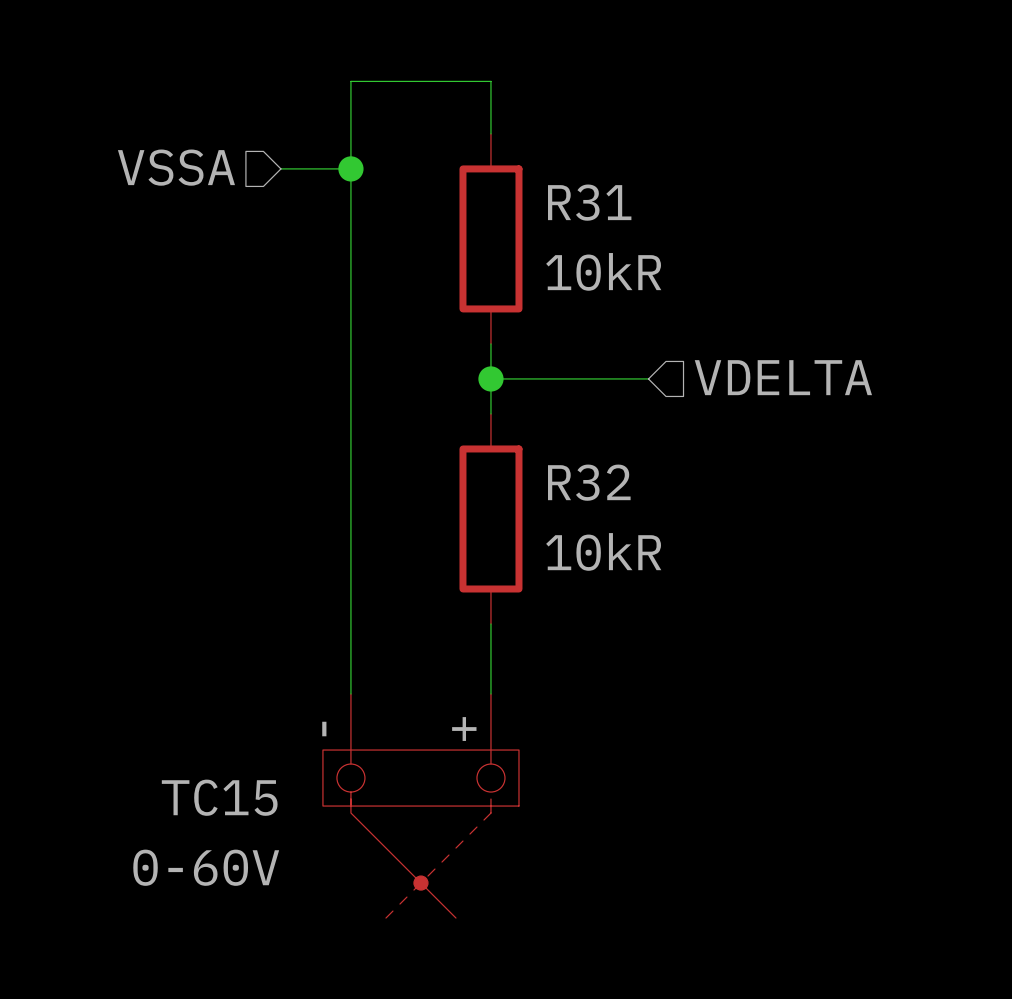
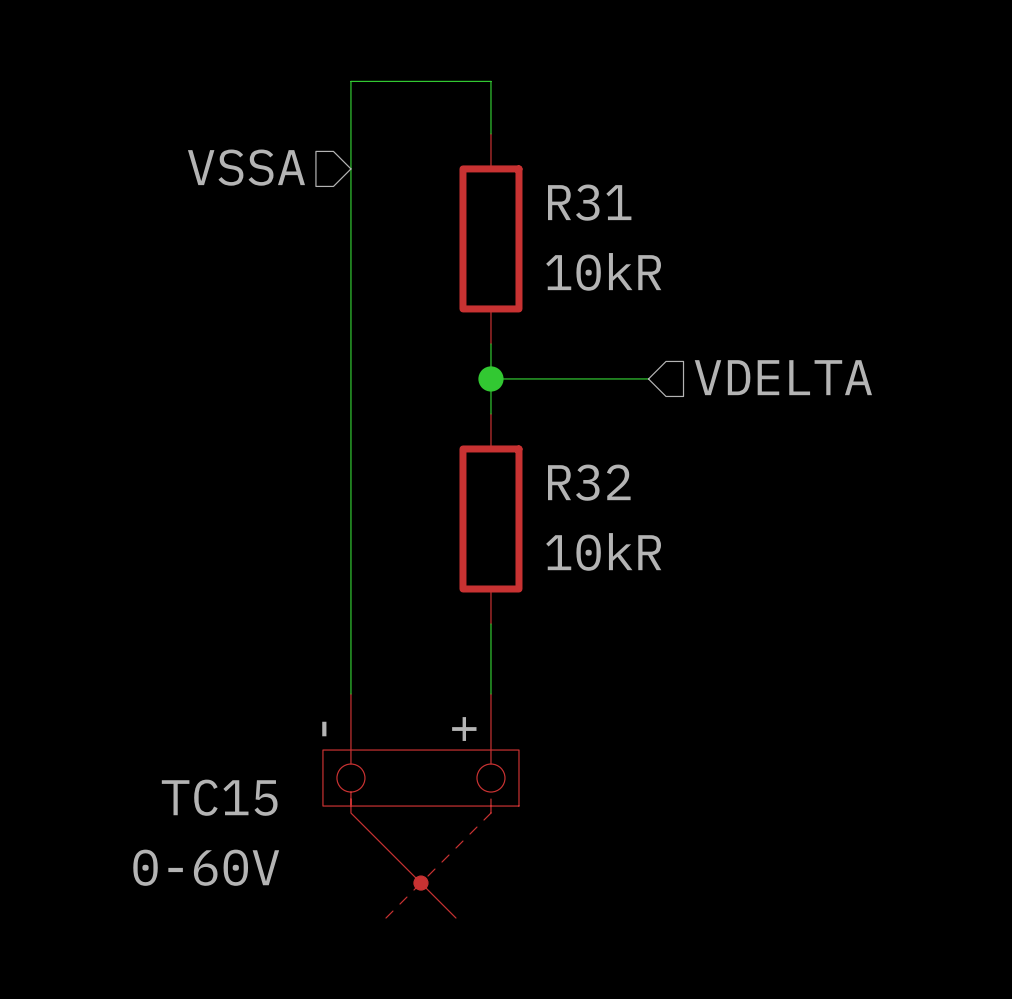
hierarchical label position: VSSA (176, 167) -> VSSA (246, 167)
wire: (280, 168) (350, 168) -> none
junction: (350, 168) -> none

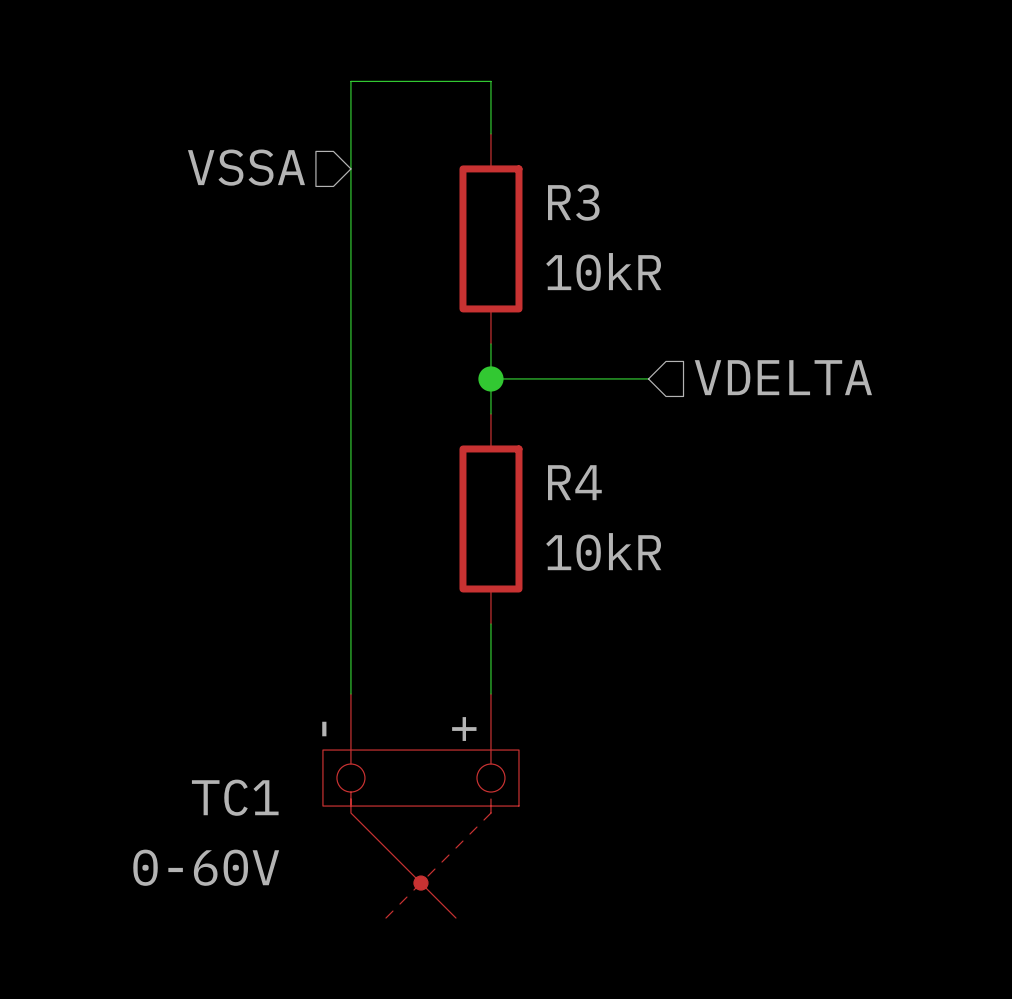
R31 name: R31 (589, 202) -> R3 (573, 202)
R32 name: R32 (589, 482) -> R4 (574, 482)
TC15 name: TC15 (219, 797) -> TC1 (235, 797)

